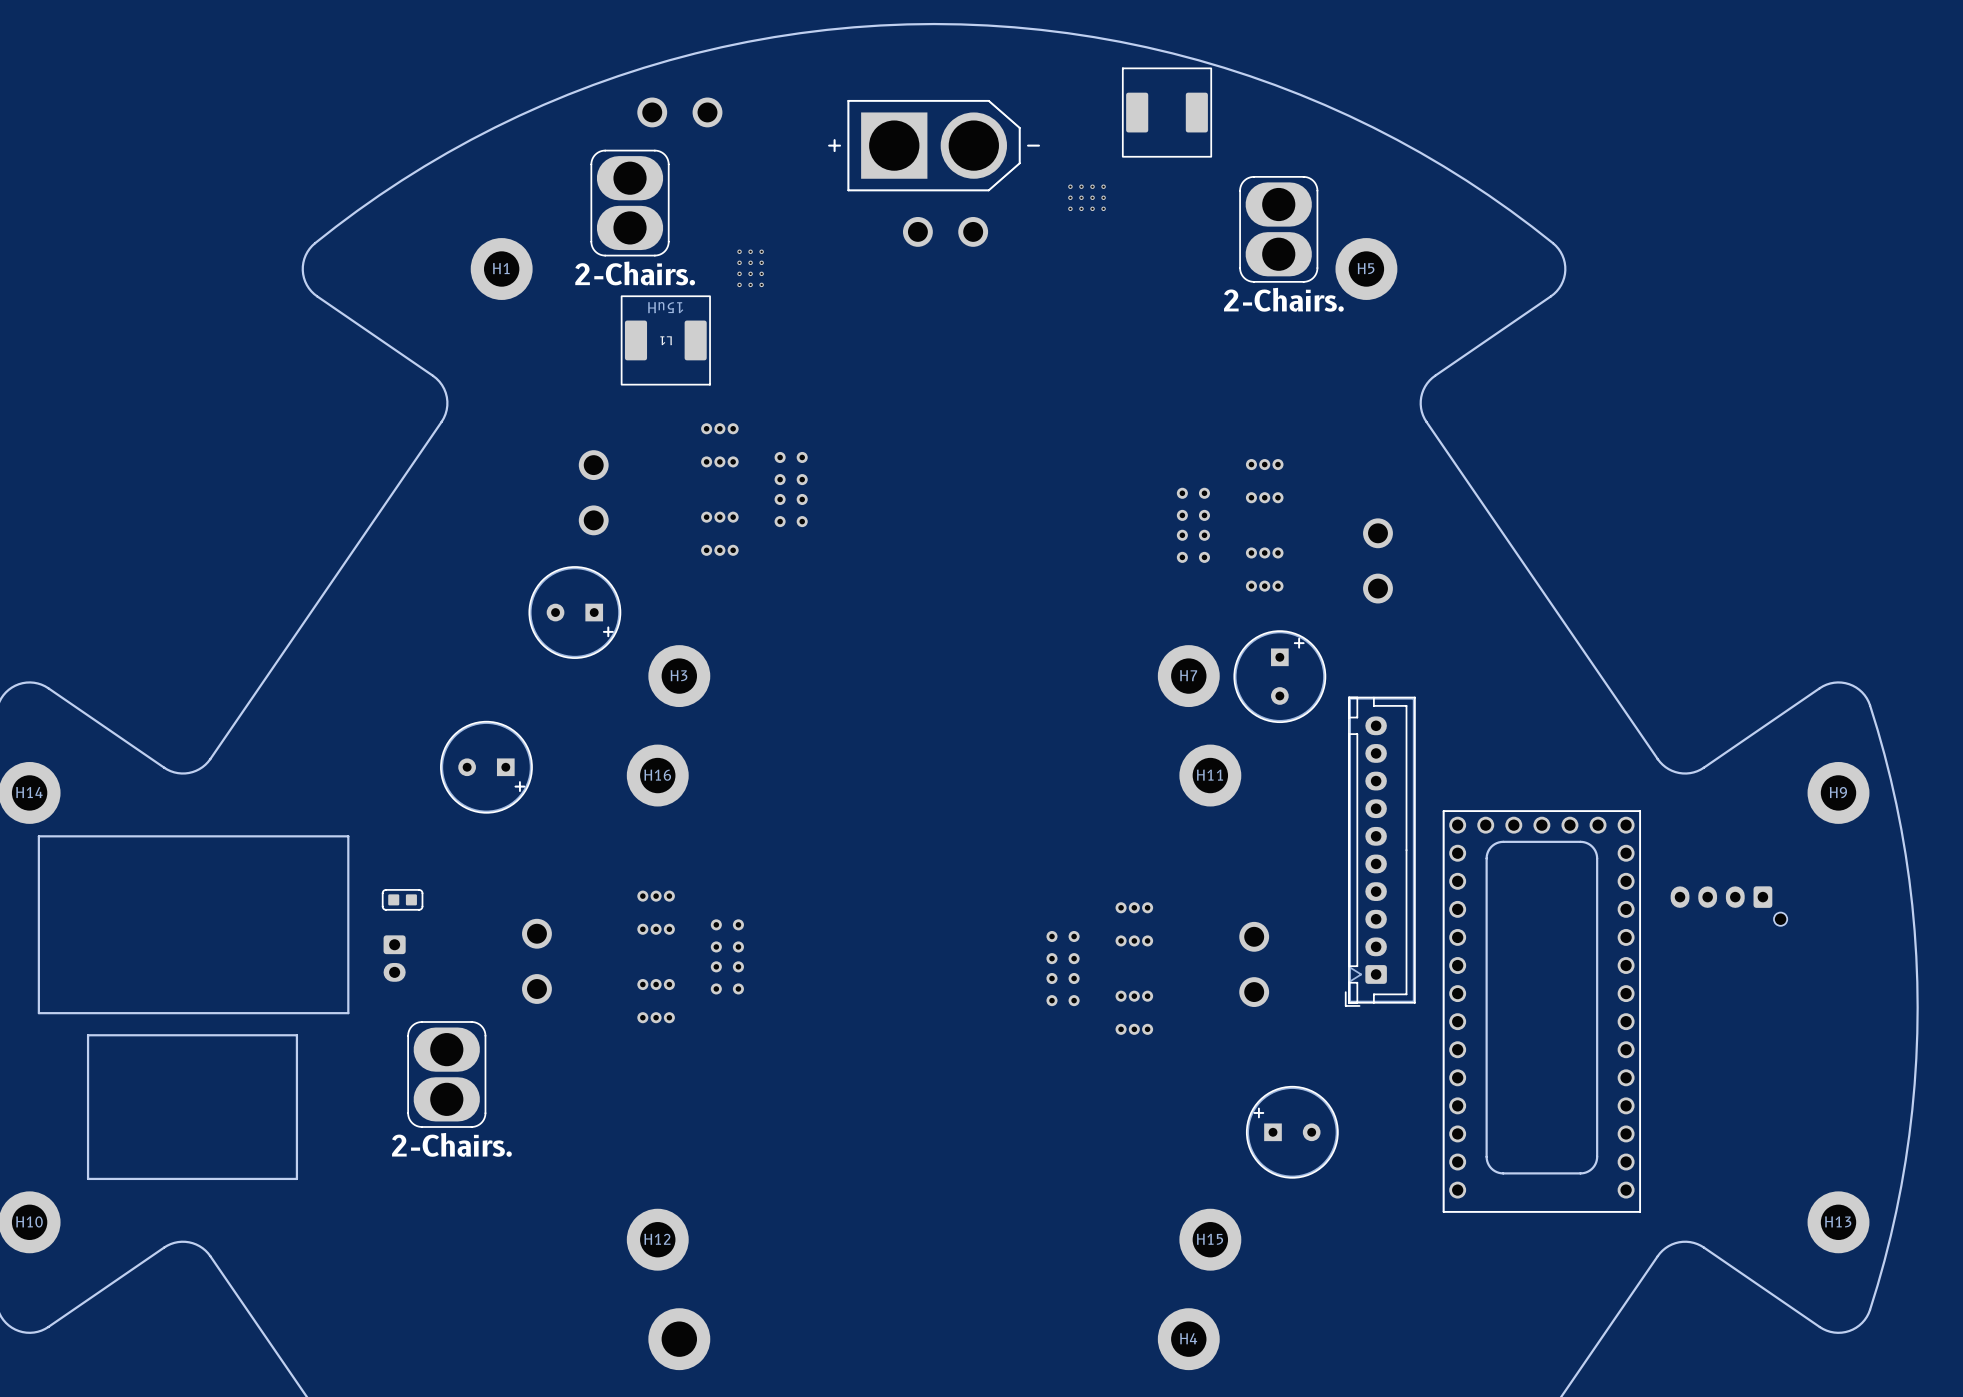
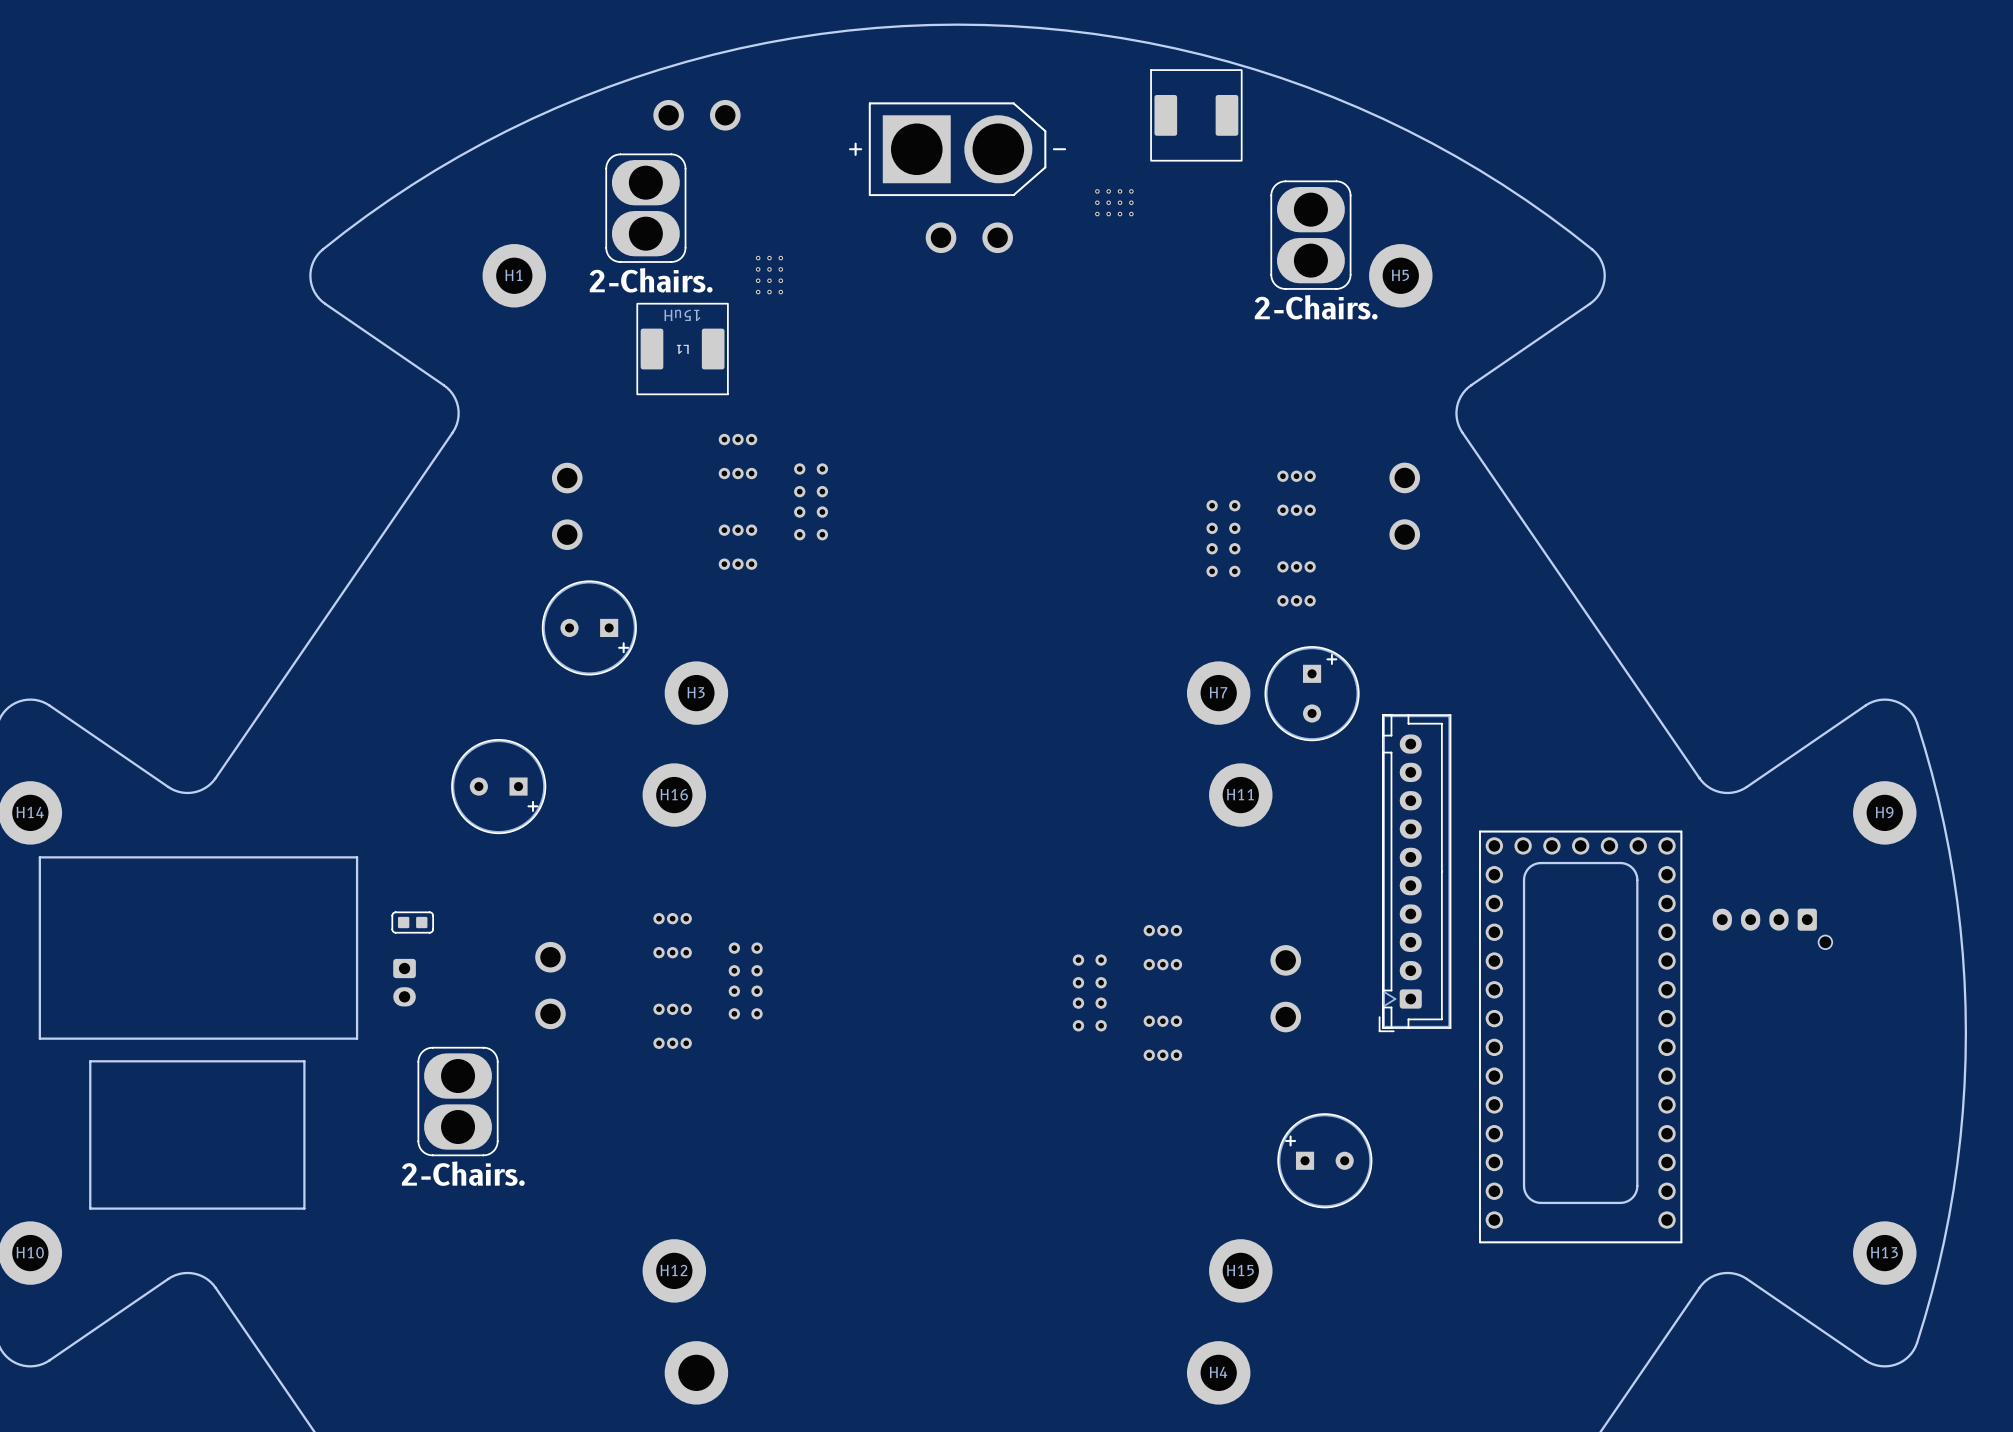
part position: (593, 492) -> (567, 506)
part position: (1377, 560) -> (1404, 506)

